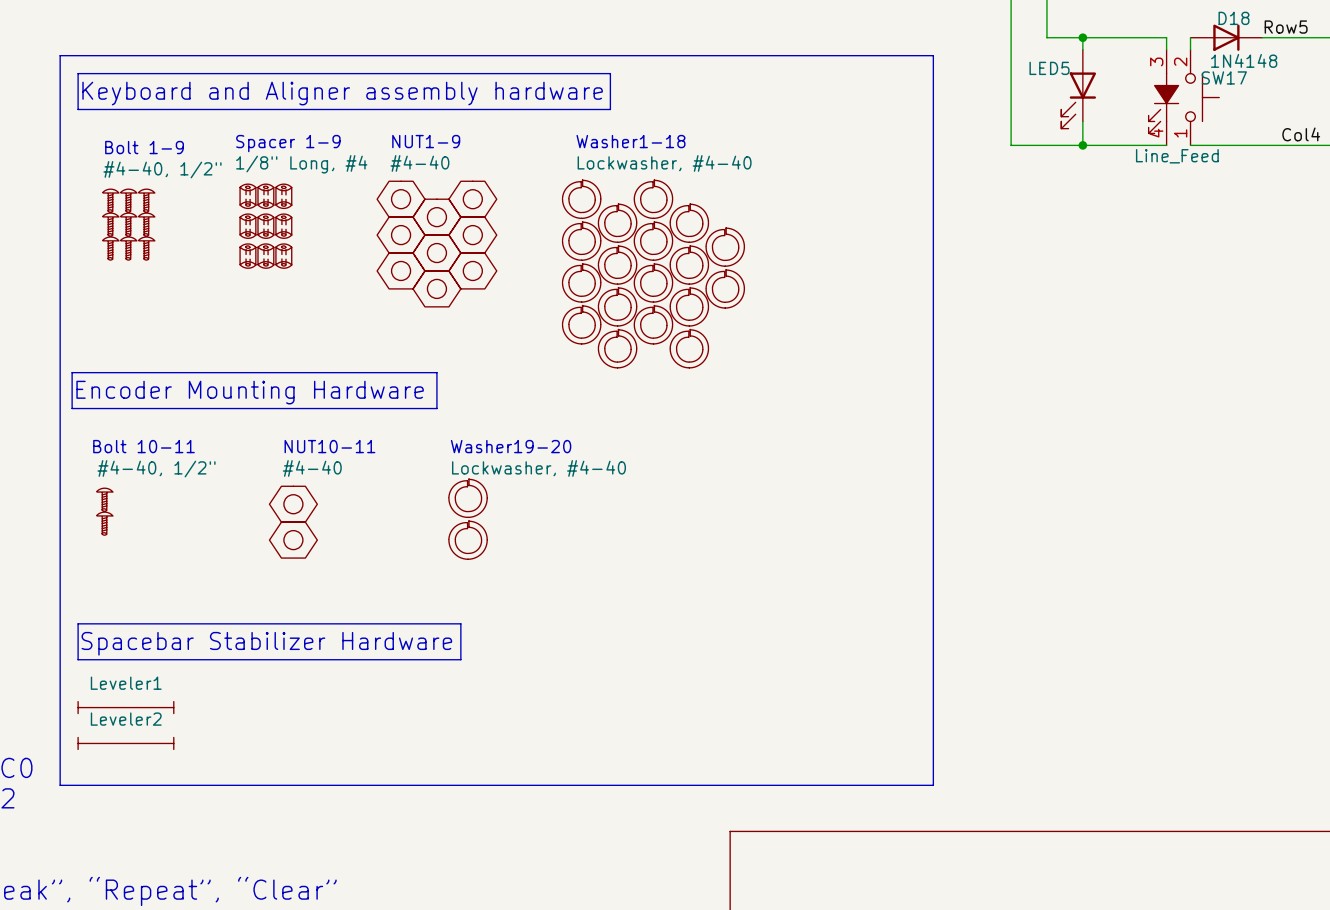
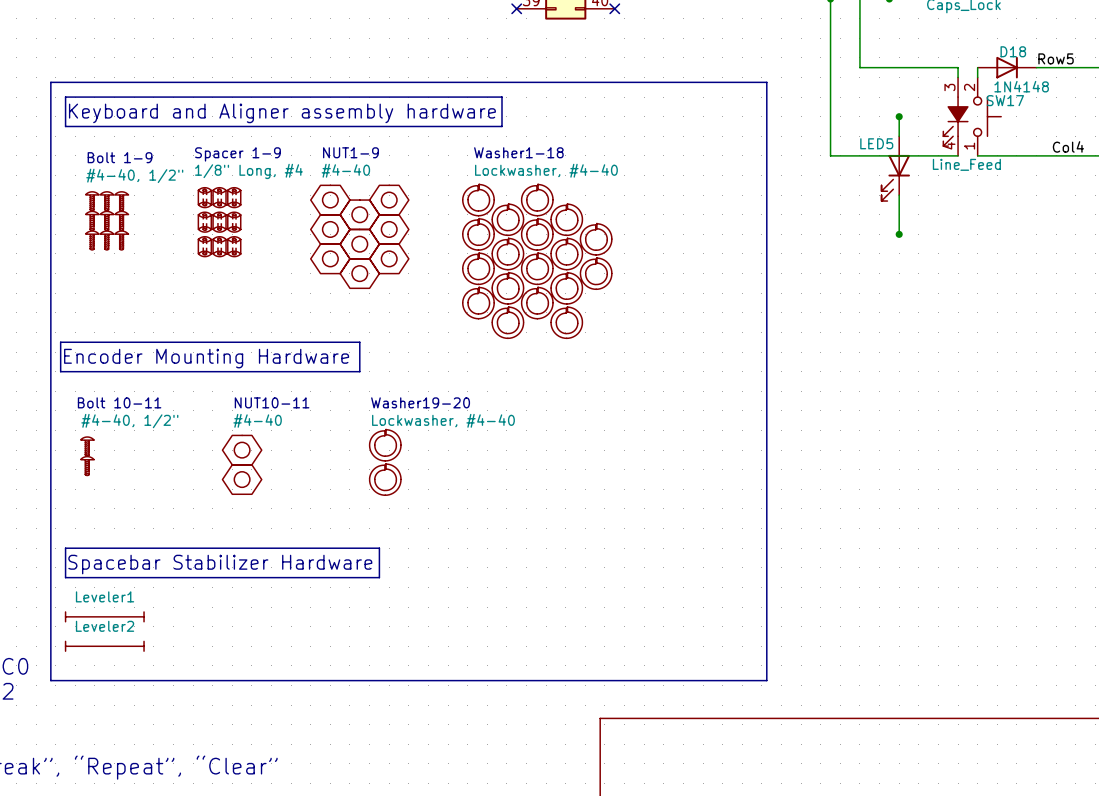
wire: (1082, 37) (1082, 49) -> none
junction: (1082, 37) -> none
LED5 name position: LED5 (1049, 68) -> LED5 (876, 143)
LED5 position: (1078, 89) -> (895, 168)
junction: none -> (899, 116)
wire: (1082, 121) (1082, 145) -> (899, 116) (899, 136)
junction: (1082, 145) -> none
wire: none -> (899, 195) (899, 234)
junction: none -> (899, 234)

